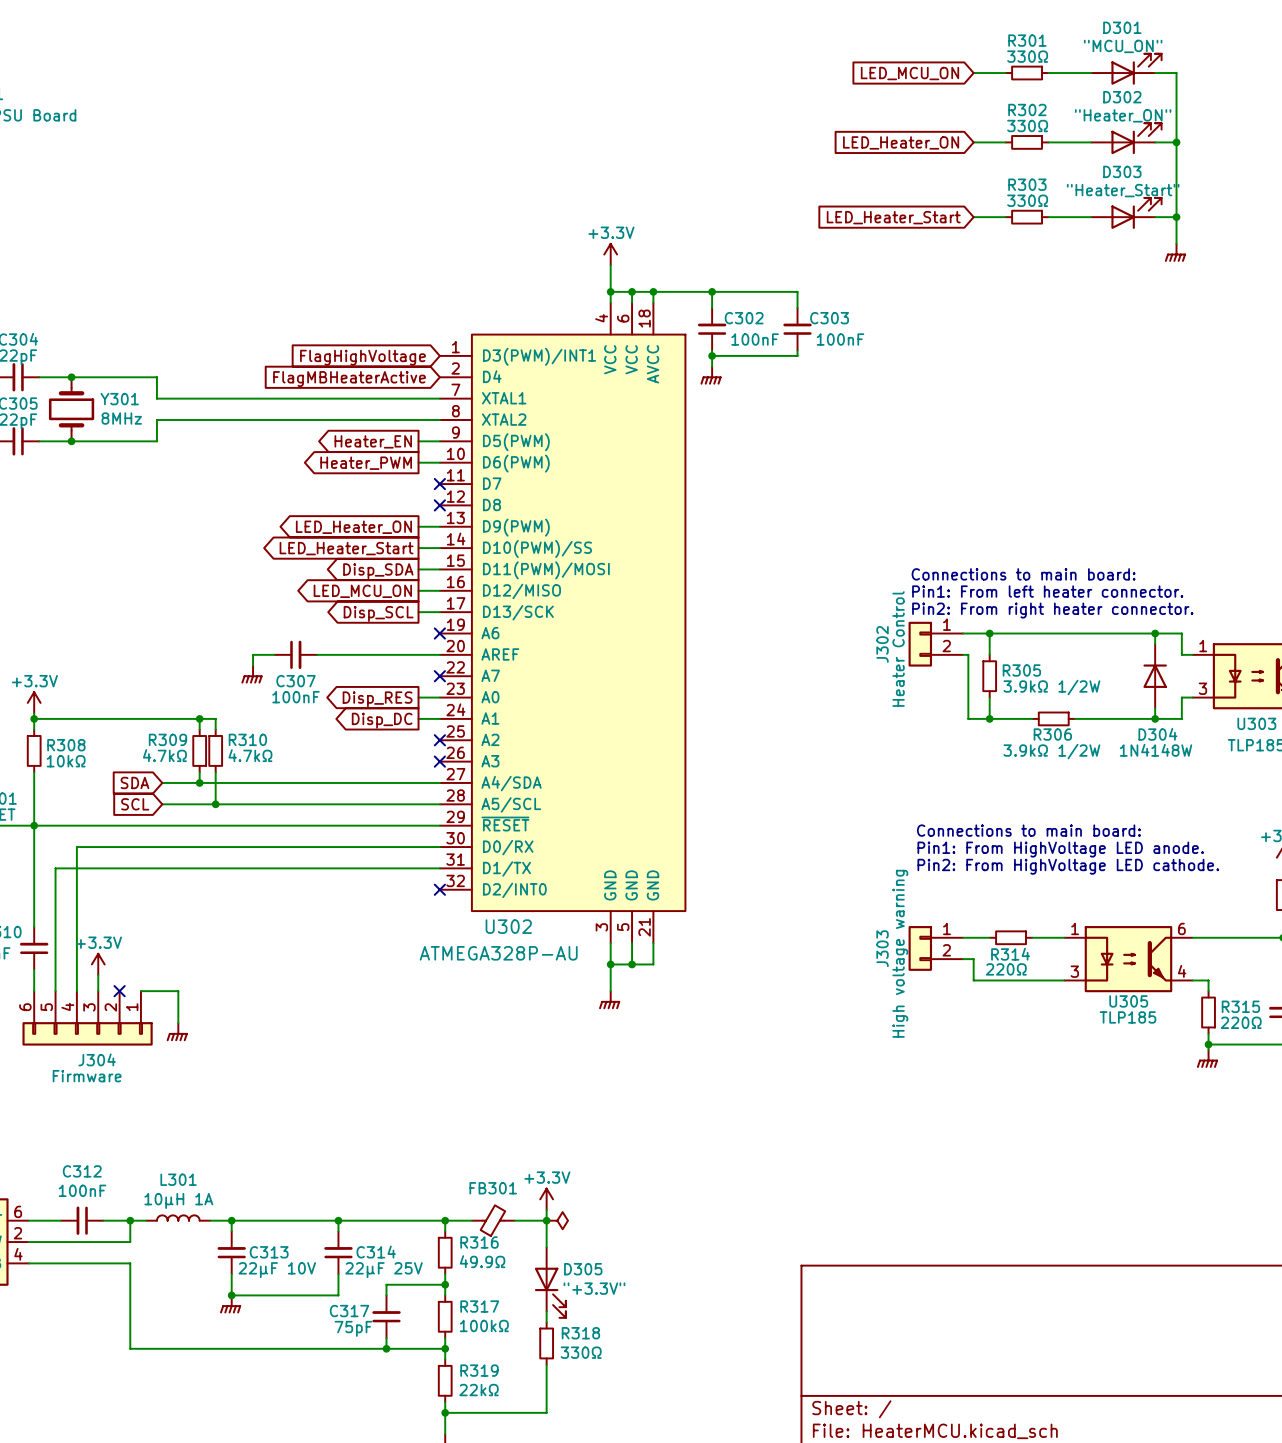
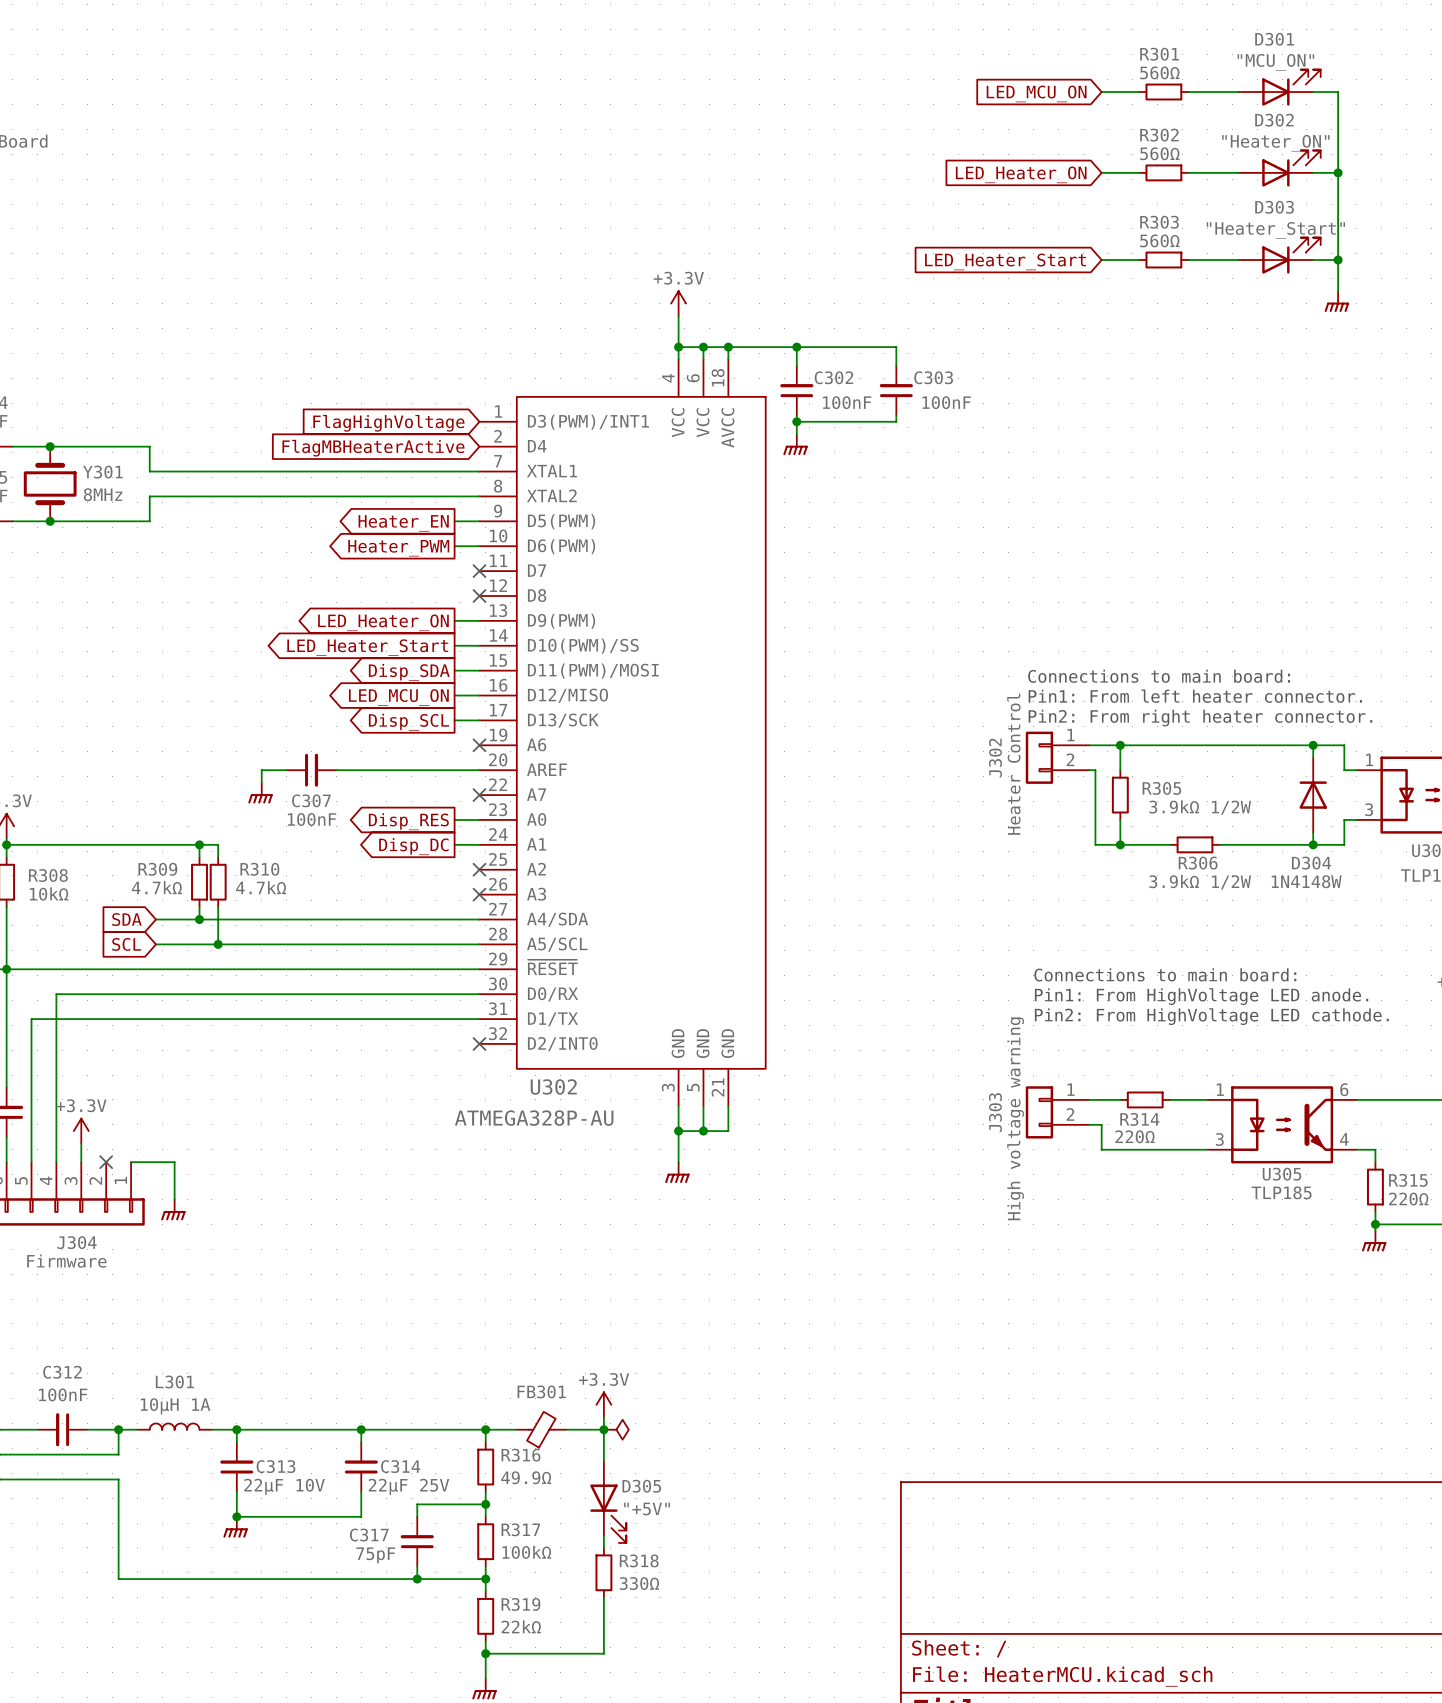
R301 value: 330Ω (1027, 56) -> 560Ω (1159, 72)
R302 value: 330Ω (1027, 126) -> 560Ω (1159, 153)
R303 value: 330Ω (1027, 200) -> 560Ω (1159, 240)
D305 value: "+3.3V" (594, 1288) -> "+5V" (647, 1509)

